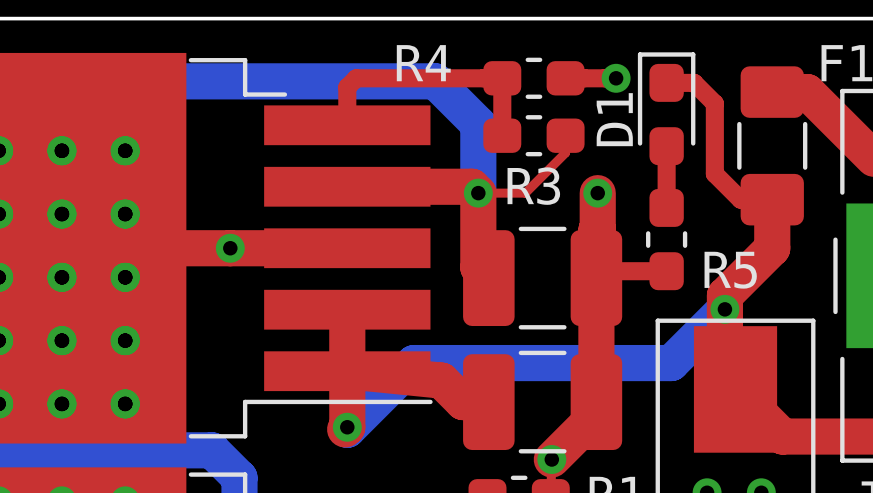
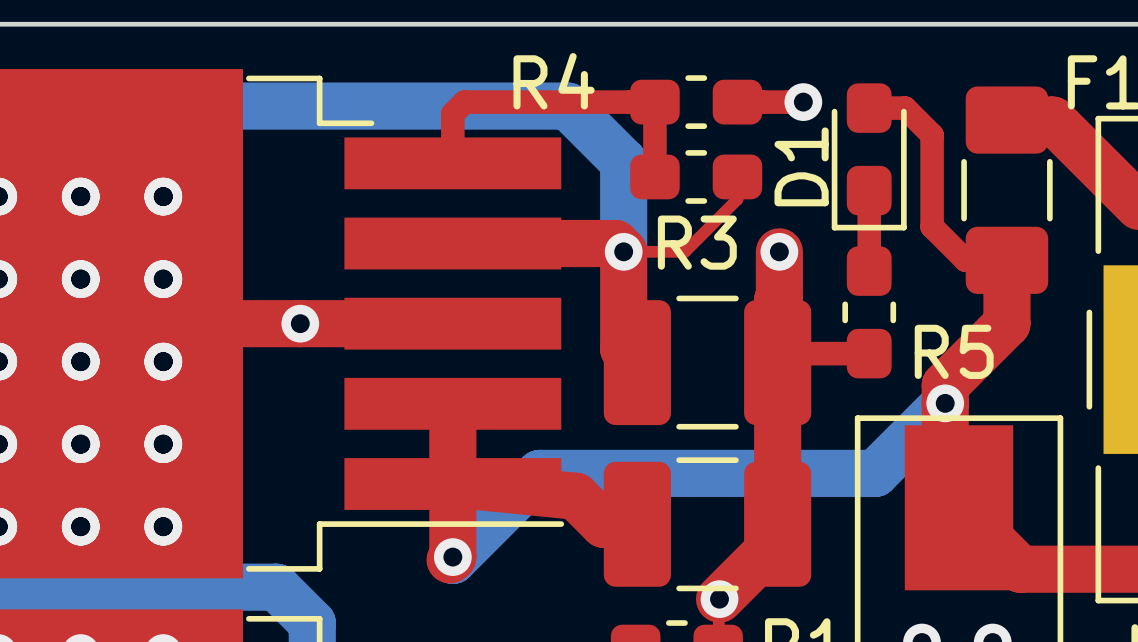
D1 rotation: 0° (666, 108) -> 180° (869, 156)

